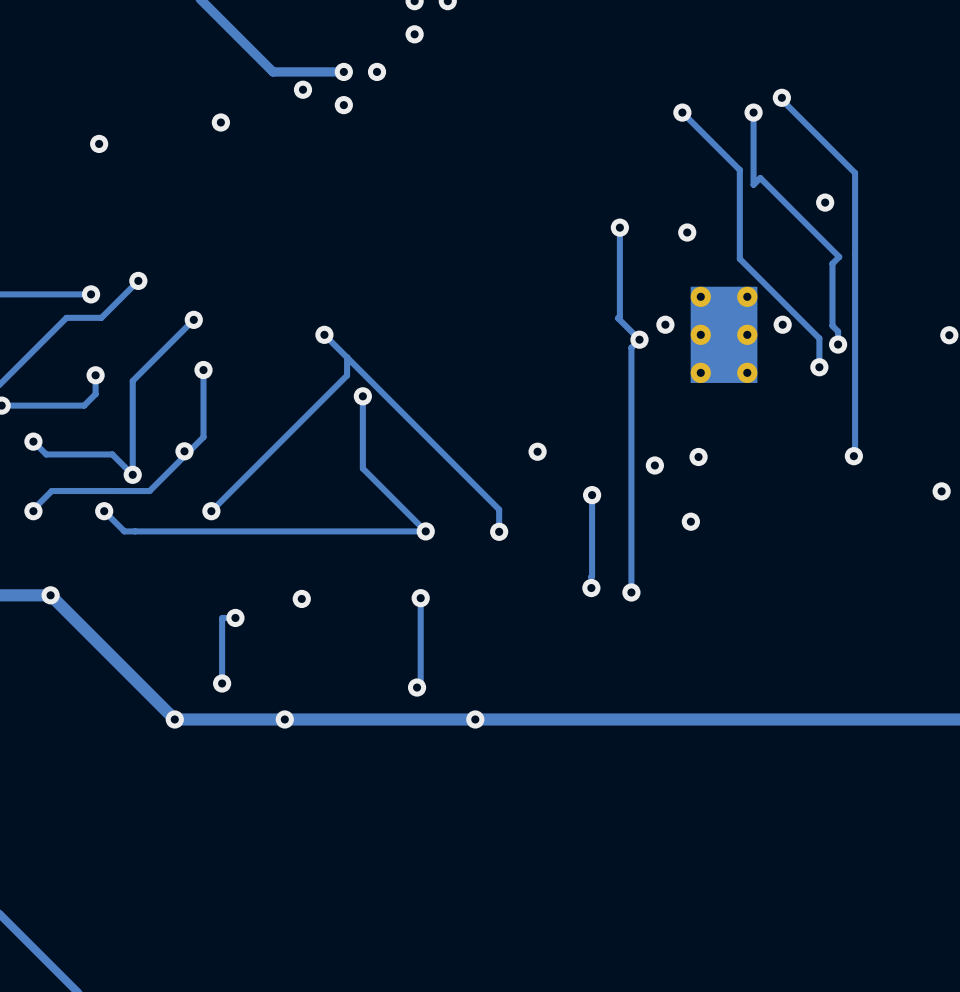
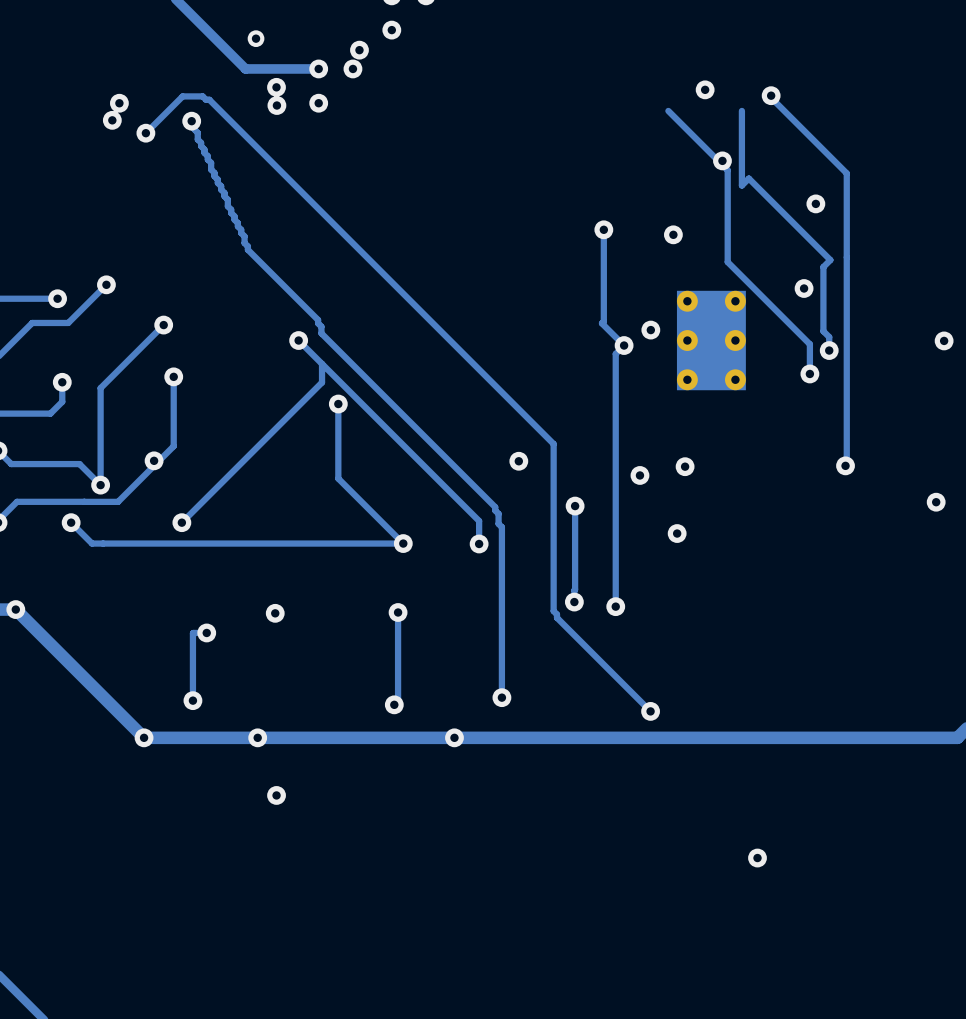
via: none -> (256, 38)
via: none -> (359, 50)
via: none -> (705, 89)
via: none -> (119, 103)
via: none -> (276, 105)
via: (682, 112) -> none
via: (753, 112) -> none
via: none -> (112, 120)
track: none -> (194, 129) (211, 162) (211, 169) (227, 199) (227, 206) (244, 236) (244, 243) (247, 249) (318, 319) (321, 326) (321, 333) (495, 507) (498, 513) (498, 523) (501, 527) (501, 697)
track: none -> (145, 133) (182, 96) (202, 96) (209, 99) (553, 444) (553, 611) (556, 617) (650, 711)
via: none -> (145, 133)
via: (99, 143) -> none
via: none -> (722, 160)
via position: (782, 324) -> (804, 288)
via: none -> (501, 697)
via: none -> (650, 711)
via: none -> (276, 795)
via: none -> (757, 858)

